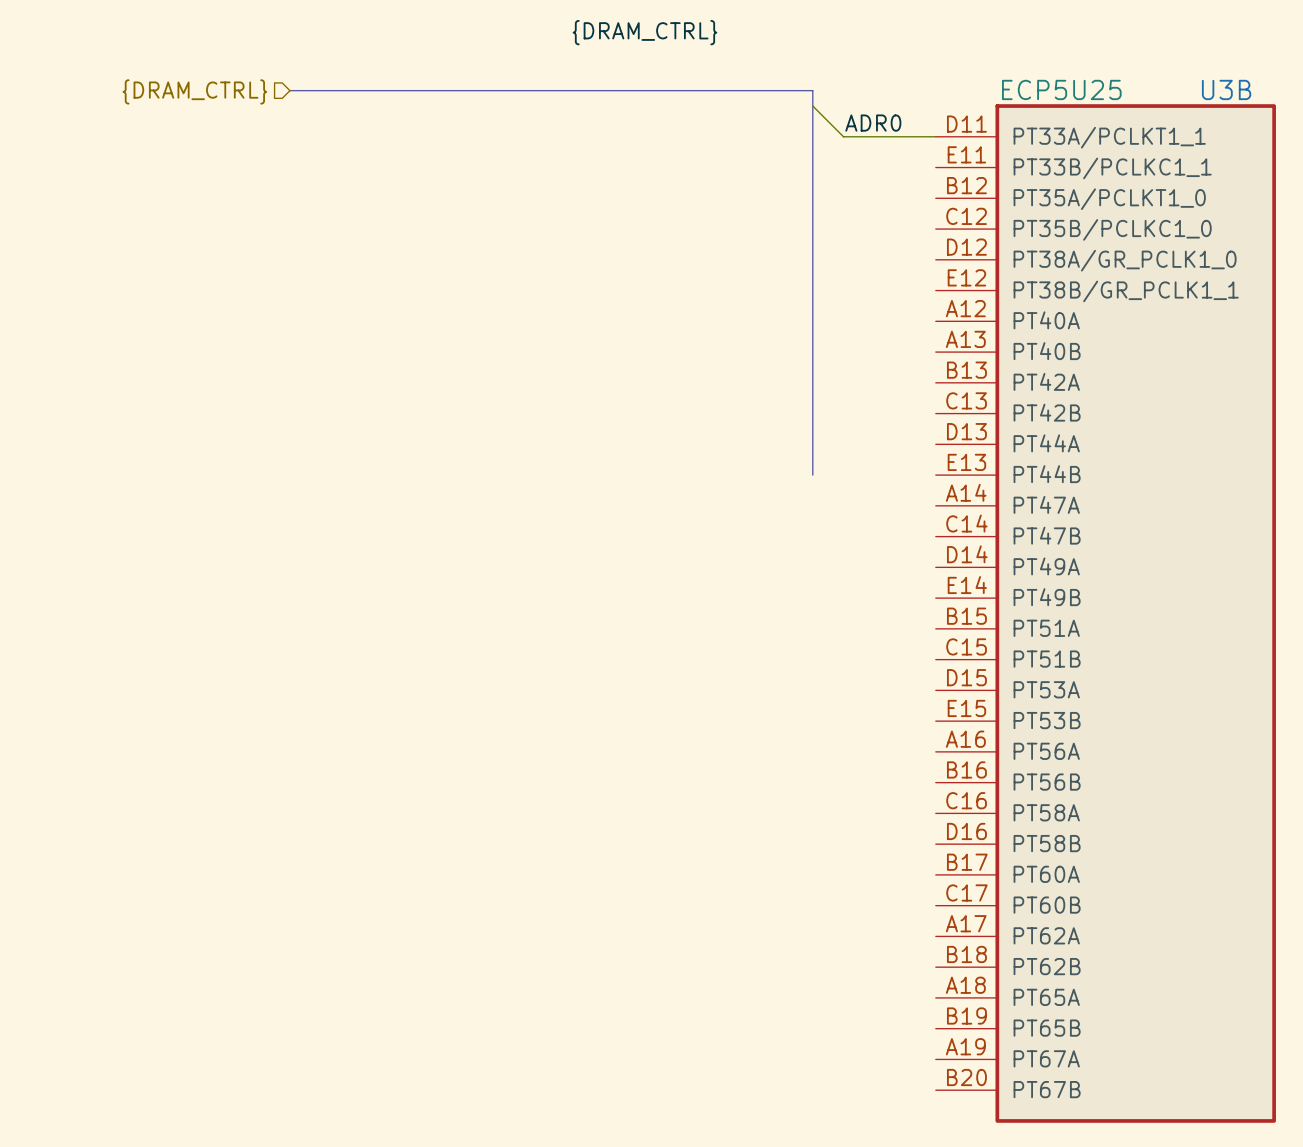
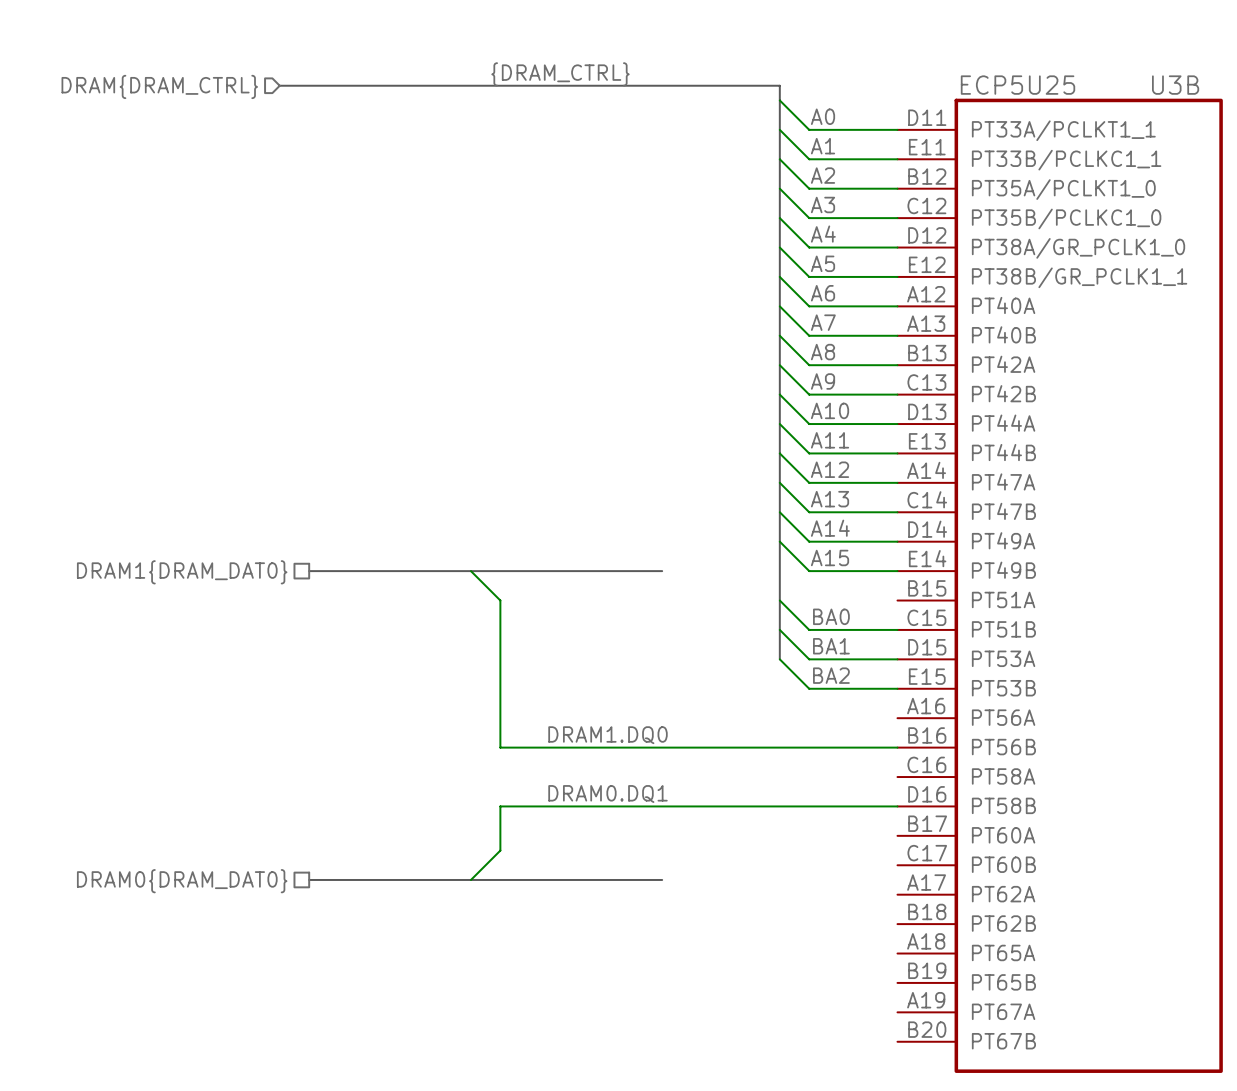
label position: {DRAM_CTRL} (644, 32) -> {DRAM_CTRL} (560, 74)
hierarchical label: {DRAM_CTRL} (194, 91) -> DRAM{DRAM_CTRL} (159, 86)
label: ADR0 (873, 123) -> A0 (823, 116)
wire: none -> (779, 129) (809, 159) (897, 159)
label: none -> A1 (823, 146)
wire: none -> (779, 159) (809, 188) (897, 188)
label: none -> A2 (823, 175)
wire: none -> (779, 188) (809, 218) (897, 218)
label: none -> A3 (823, 204)
wire: none -> (779, 218) (809, 247) (897, 247)
label: none -> A4 (823, 234)
wire: none -> (779, 247) (809, 276) (897, 276)
label: none -> A5 (823, 263)
wire: none -> (779, 276) (809, 306) (897, 306)
label: none -> A6 (823, 293)
wire: none -> (779, 306) (809, 335) (897, 335)
label: none -> A7 (823, 322)
wire: none -> (779, 335) (809, 365) (897, 365)
label: none -> A8 (823, 352)
wire: none -> (779, 365) (809, 394) (897, 394)
label: none -> A9 (823, 381)
wire: none -> (779, 394) (809, 424) (897, 424)
label: none -> A10 (830, 410)
wire: none -> (779, 424) (809, 453) (897, 453)
label: none -> A11 (830, 440)
wire: none -> (779, 453) (809, 482) (897, 482)
bus: none -> (779, 453) (779, 659)
label: none -> A12 (830, 469)
wire: none -> (779, 482) (809, 512) (897, 512)
label: none -> A13 (830, 499)
wire: none -> (779, 512) (809, 541) (897, 541)
label: none -> A14 (830, 528)
wire: none -> (779, 541) (809, 571) (897, 571)
label: none -> A15 (830, 557)
bus: none -> (309, 571) (662, 571)
wire: none -> (470, 571) (500, 600) (500, 747) (897, 747)
hierarchical label: none -> DRAM1{DRAM_DAT0} (182, 572)
wire: none -> (779, 600) (809, 629) (897, 629)
label: none -> BA0 (831, 616)
wire: none -> (779, 629) (809, 659) (897, 659)
label: none -> BA1 (831, 646)
wire: none -> (779, 659) (809, 688) (897, 688)
label: none -> BA2 (831, 675)
label: none -> DRAM1.DQ0 (607, 735)
label: none -> DRAM0.DQ1 (607, 794)
wire: none -> (897, 806) (500, 806) (500, 850) (470, 879)
bus: none -> (309, 879) (662, 879)
hierarchical label: none -> DRAM0{DRAM_DAT0} (182, 881)

